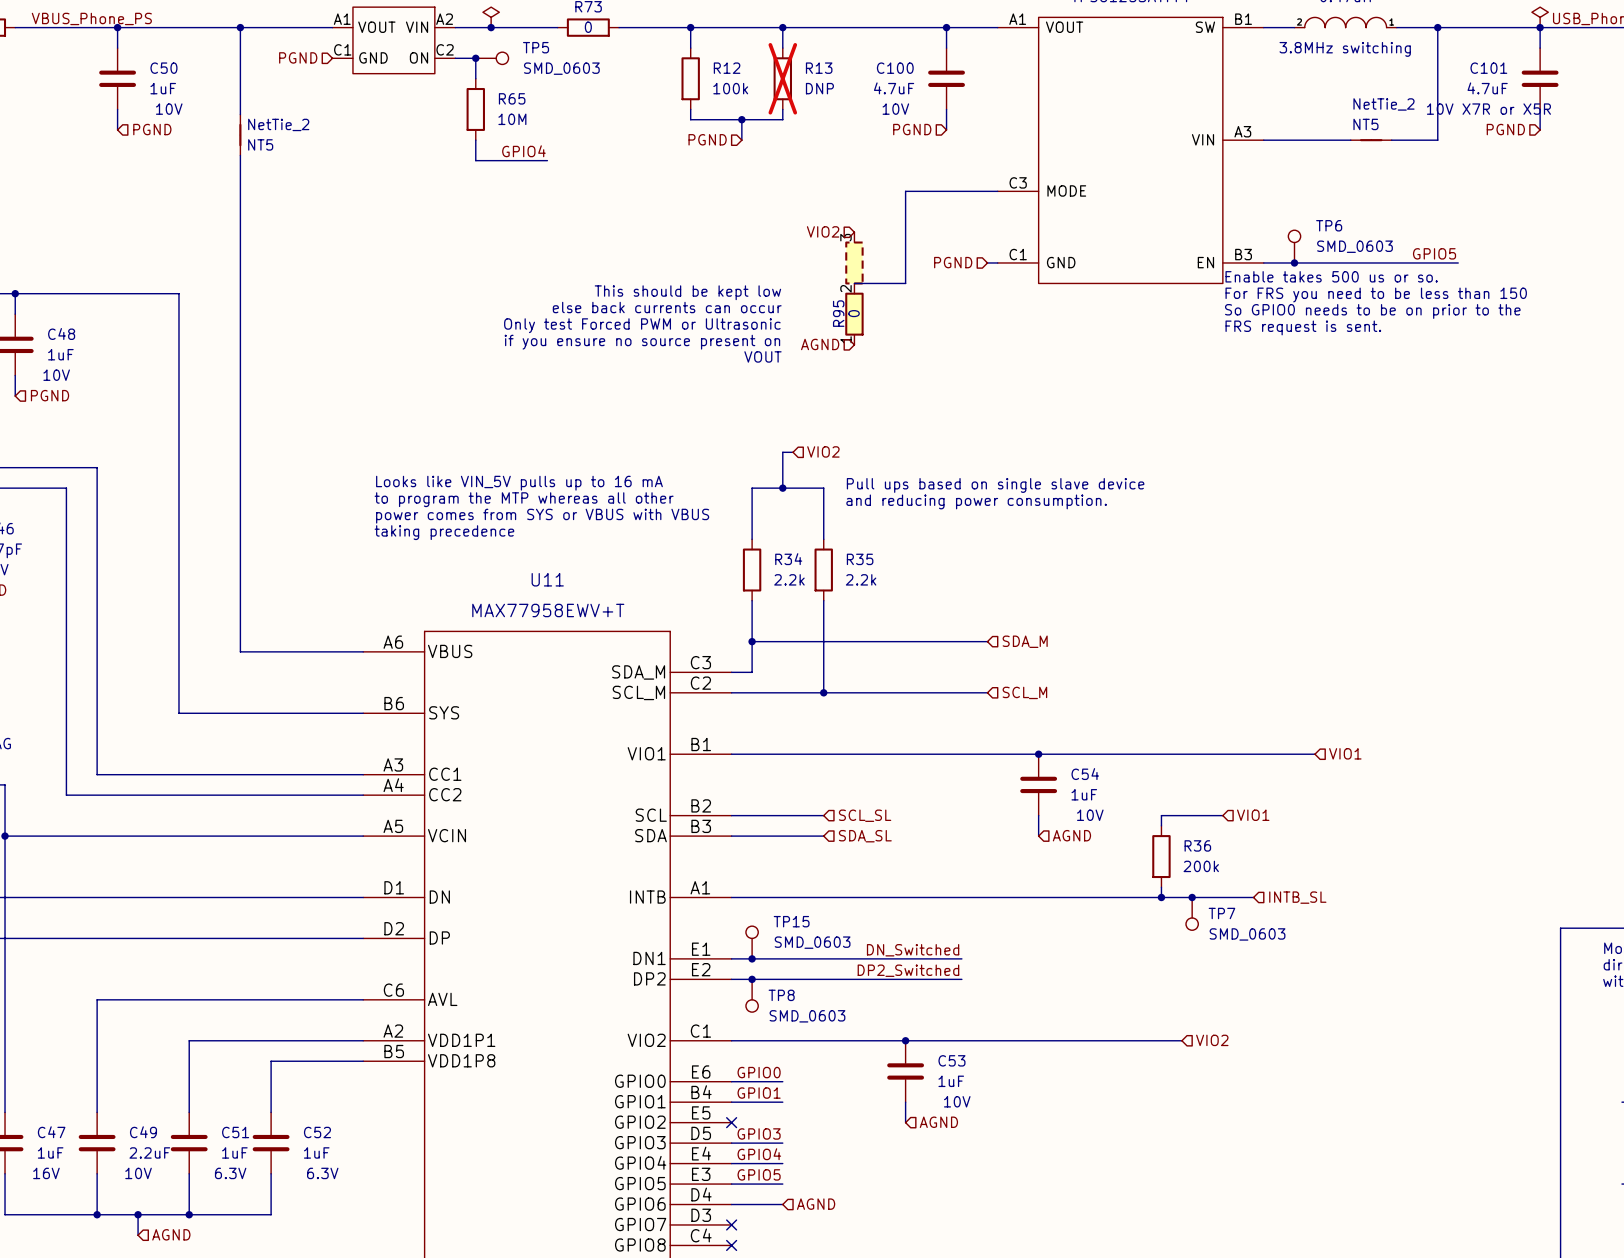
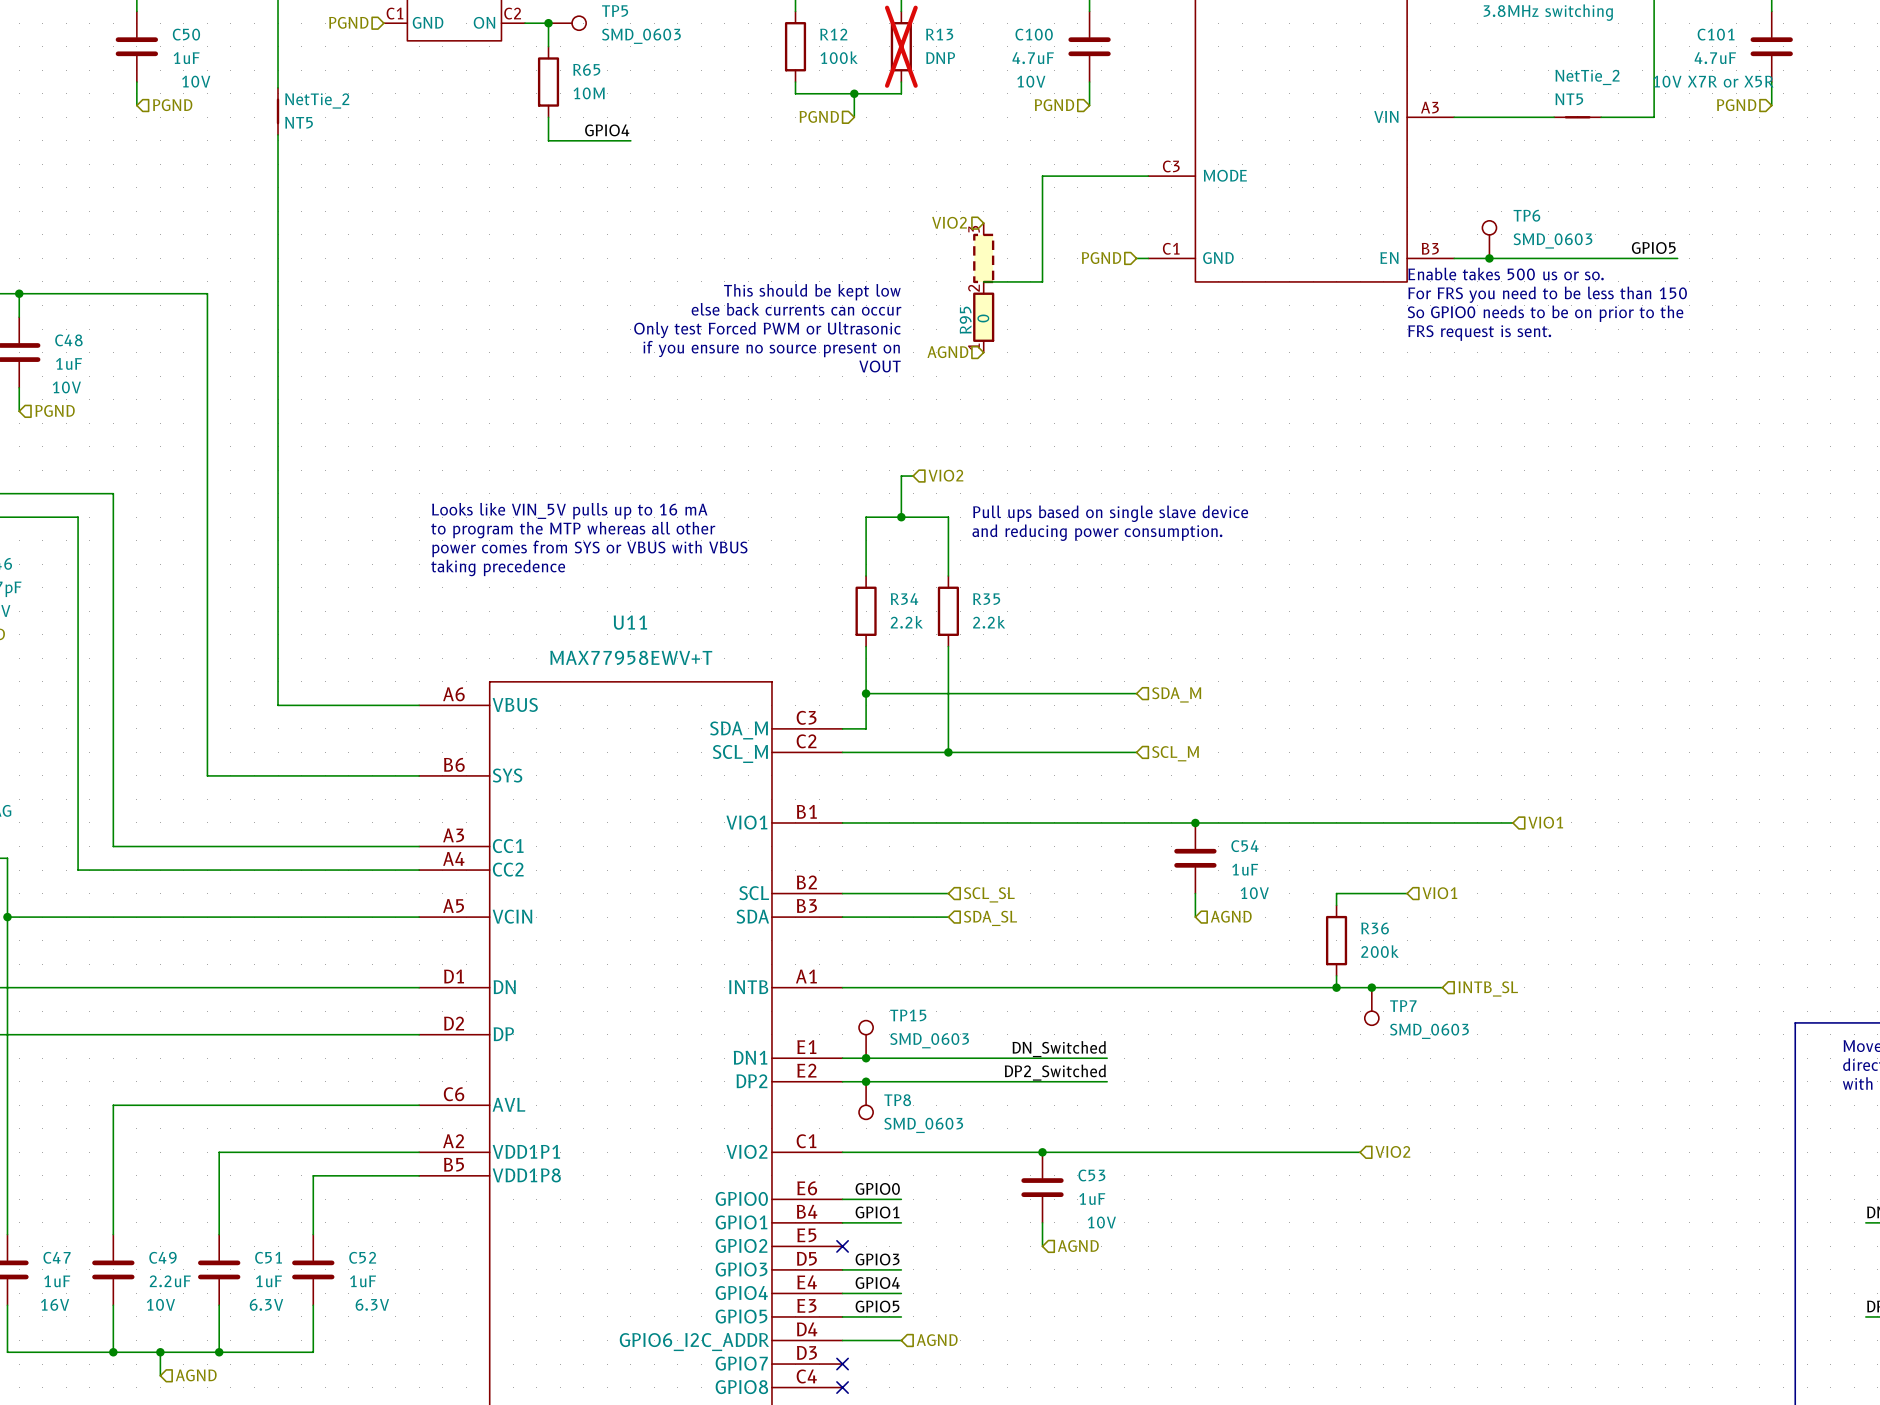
U11 pin name: GPIO6 (640, 1204) -> GPIO6_I2C_ADDR (694, 1342)

